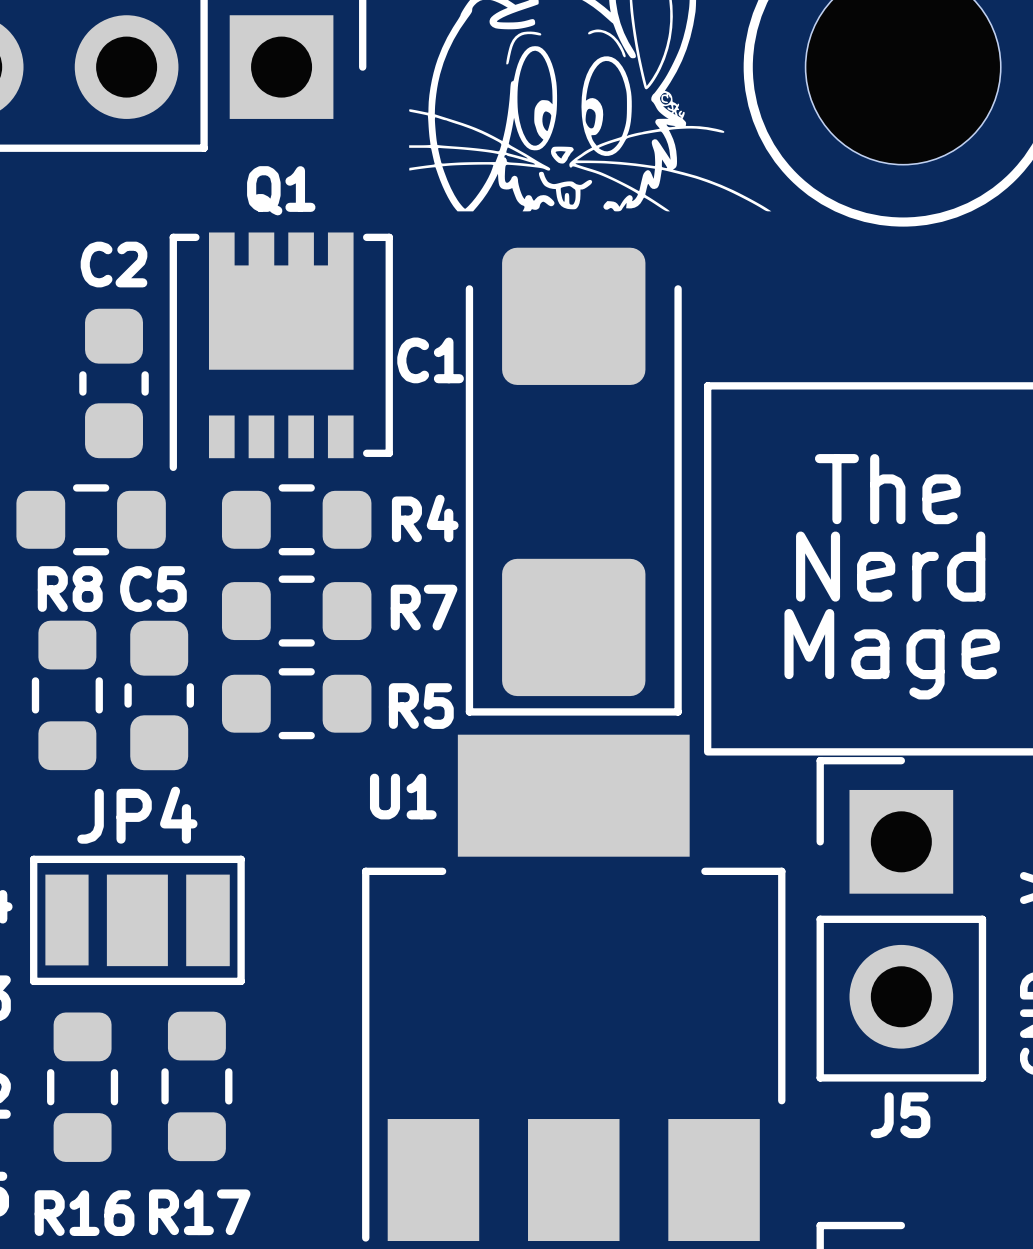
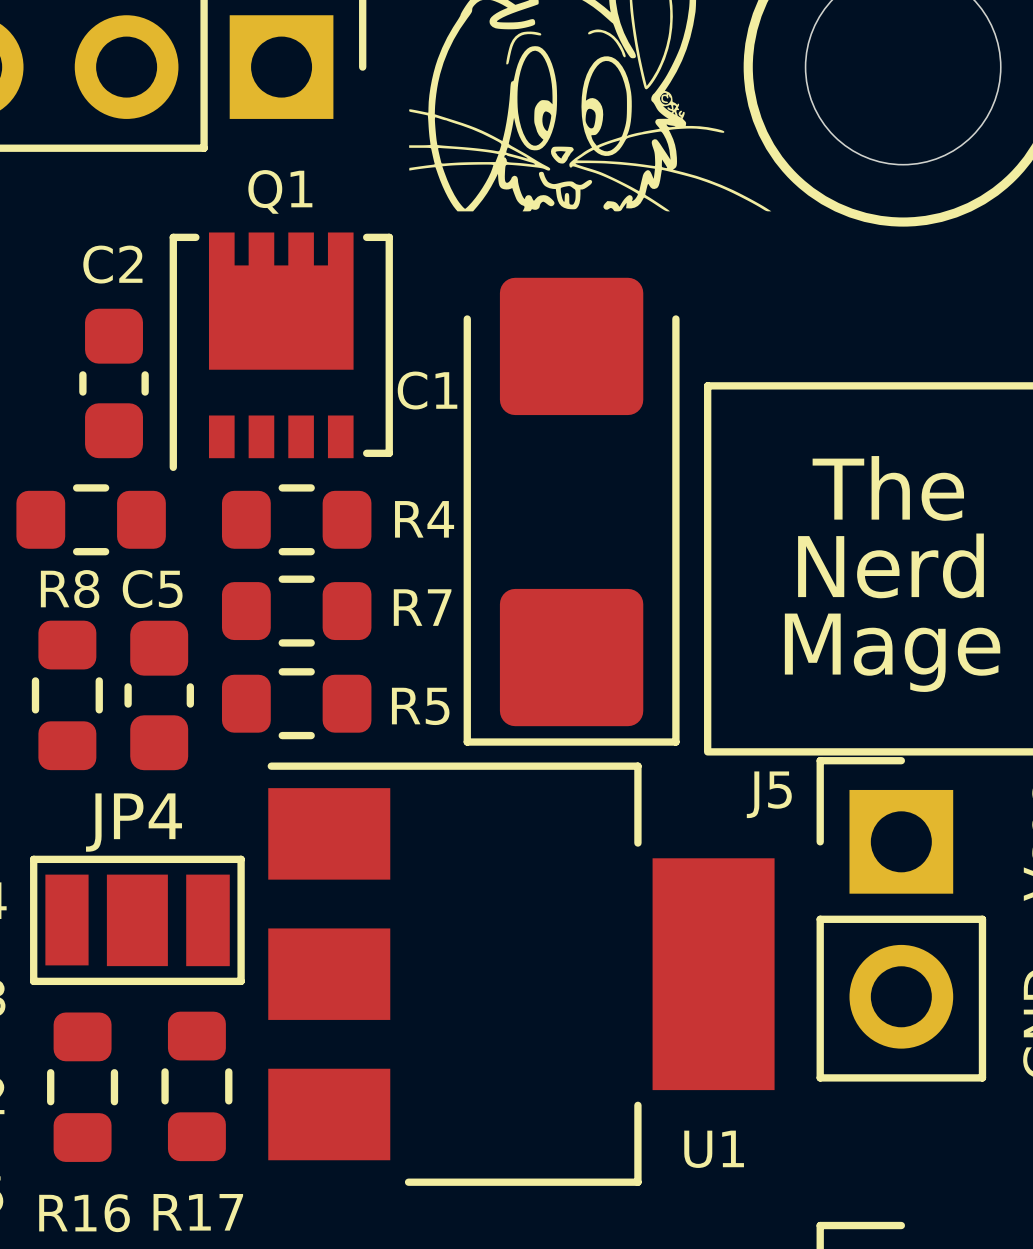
C1 position: (573, 481) -> (571, 511)
U1 name position: U1 (403, 796) -> U1 (714, 1149)
U1 rotation: 0° (573, 988) -> 90° clockwise (521, 974)
J5 name position: J5 (900, 1115) -> J5 (769, 794)

